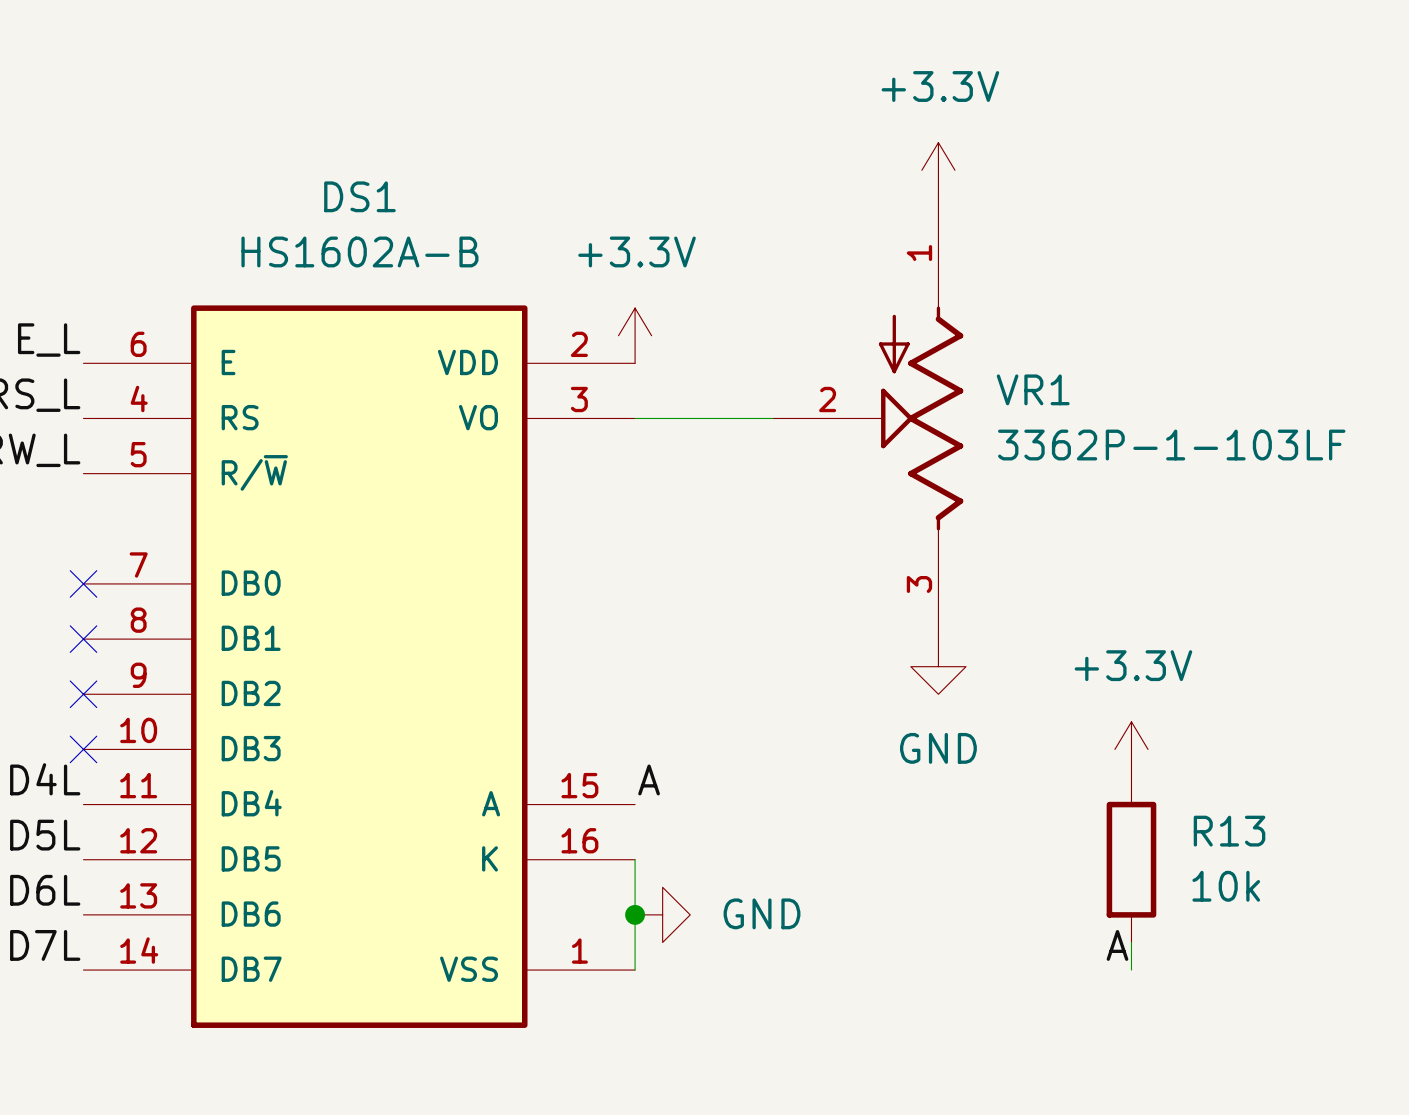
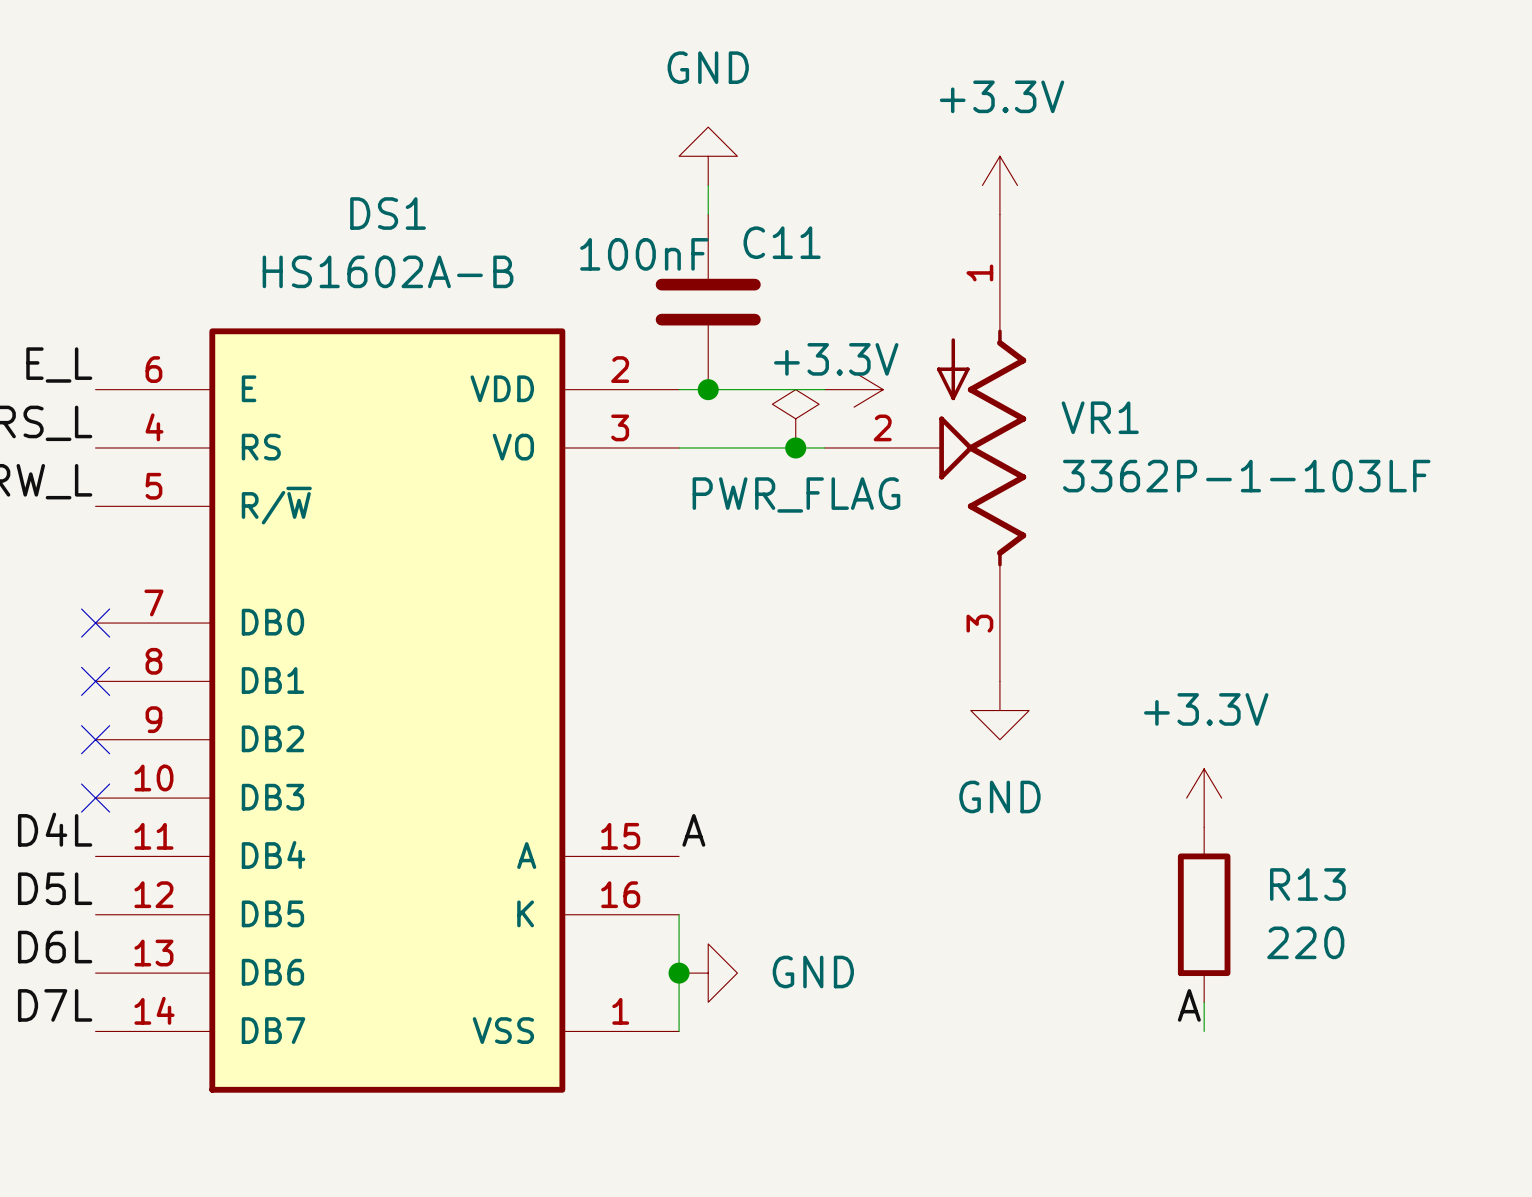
power symbol: none -> GND (708, 156)
wire: none -> (708, 185) (708, 214)
power symbol text position: +3.3V (637, 251) -> +3.3V (836, 359)
C11: none -> 100nF (708, 302)
power symbol rotation: 0° (635, 335) -> 90° clockwise (854, 389)
power symbol position: +3.3V (635, 335) -> +3.3V (854, 389)
wire: none -> (679, 389) (824, 389)
junction: none -> (708, 389)
power symbol: none -> PWR_FLAG (795, 418)
junction: none -> (795, 447)
R13 value: 10k (1226, 886) -> 220 (1305, 942)

